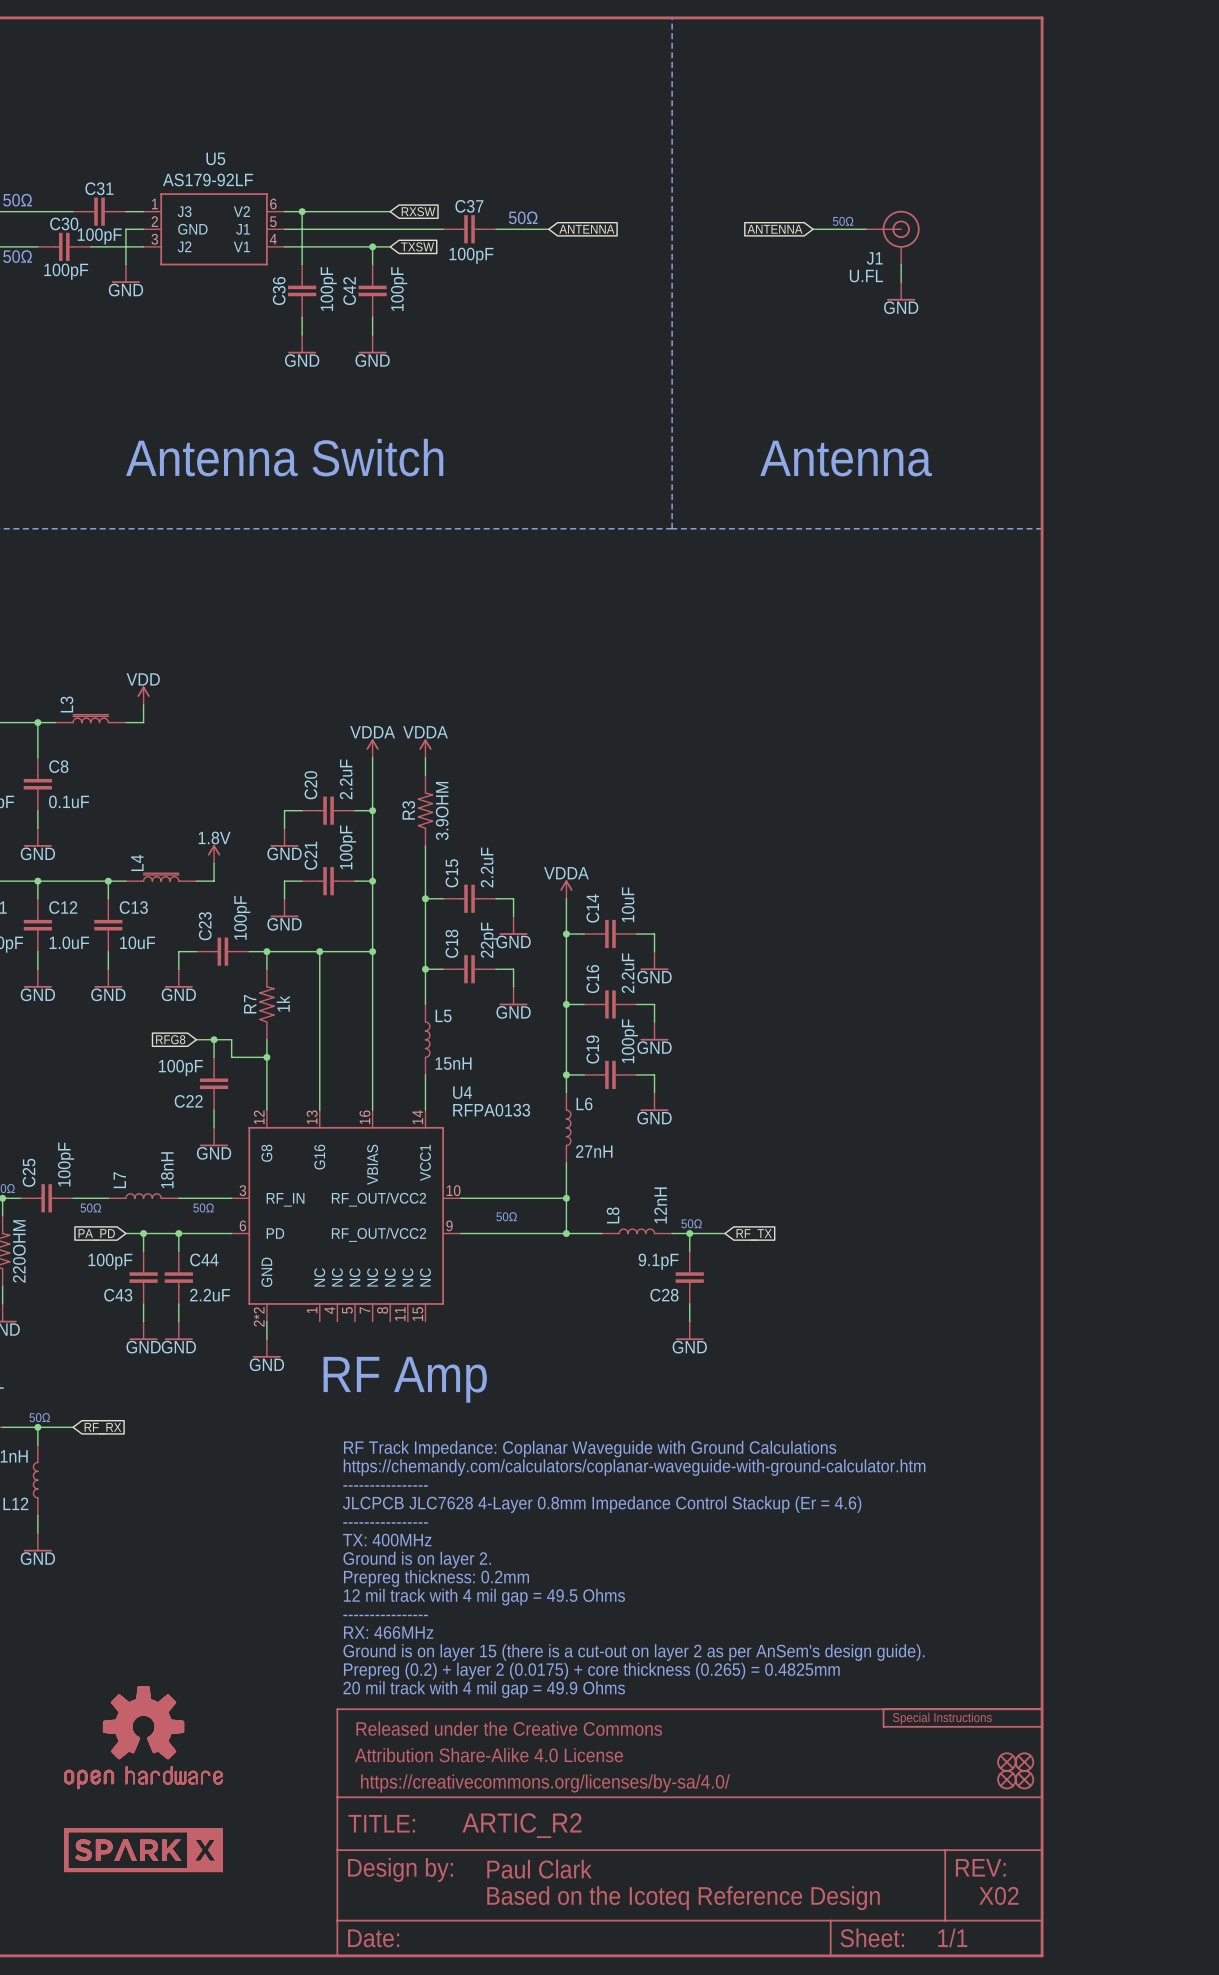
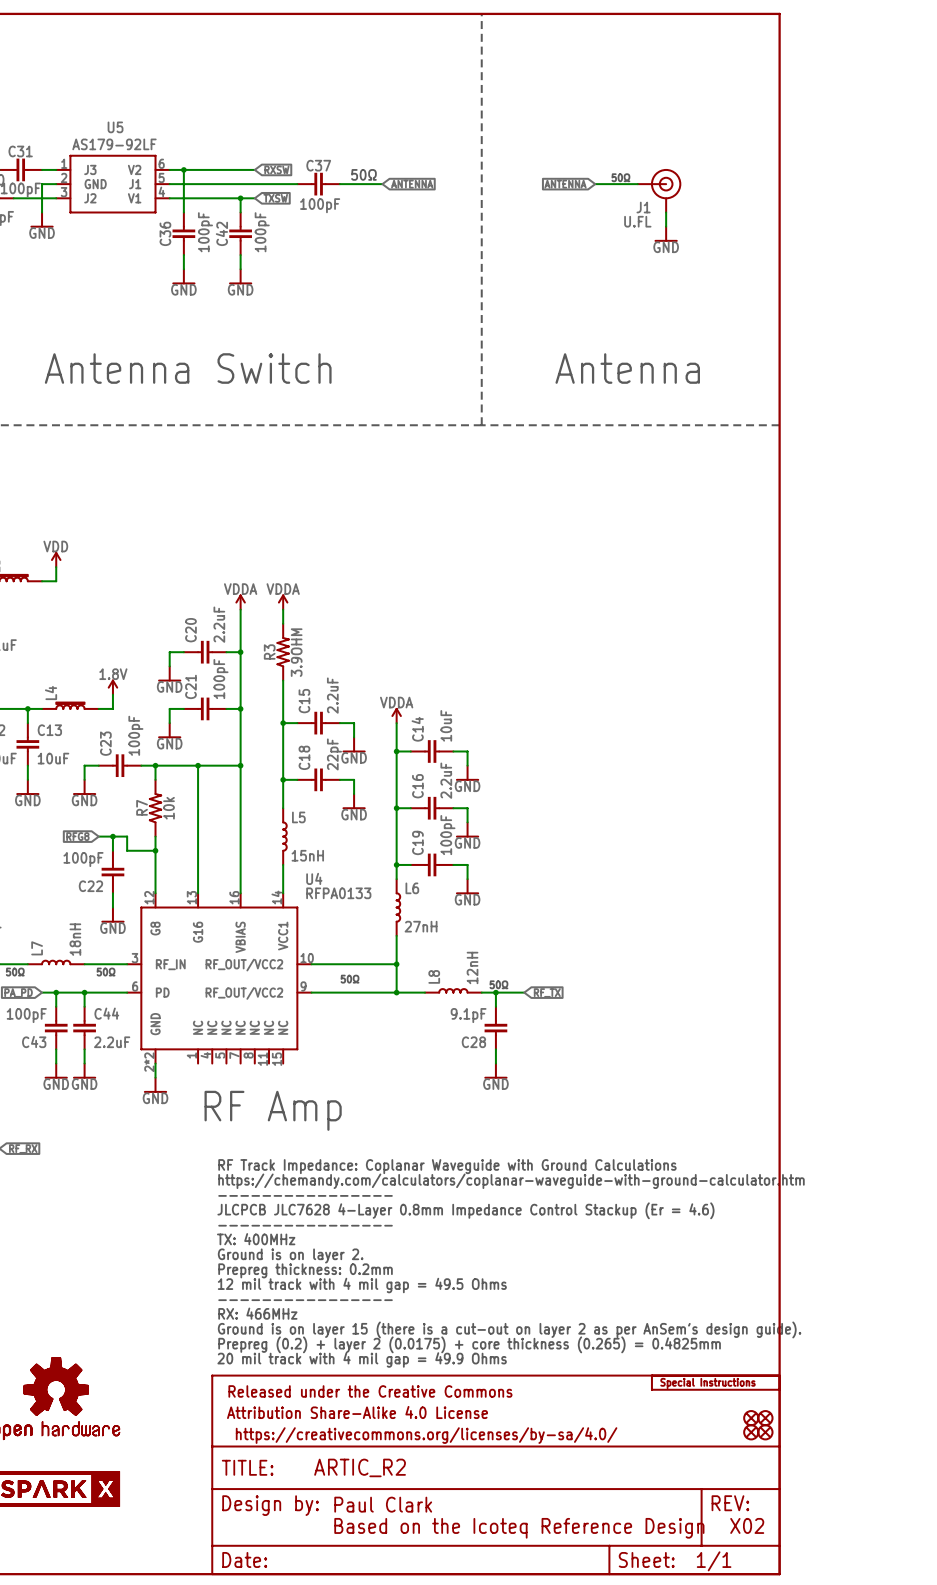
R7 value: 1k (283, 1003) -> 10k (168, 808)

